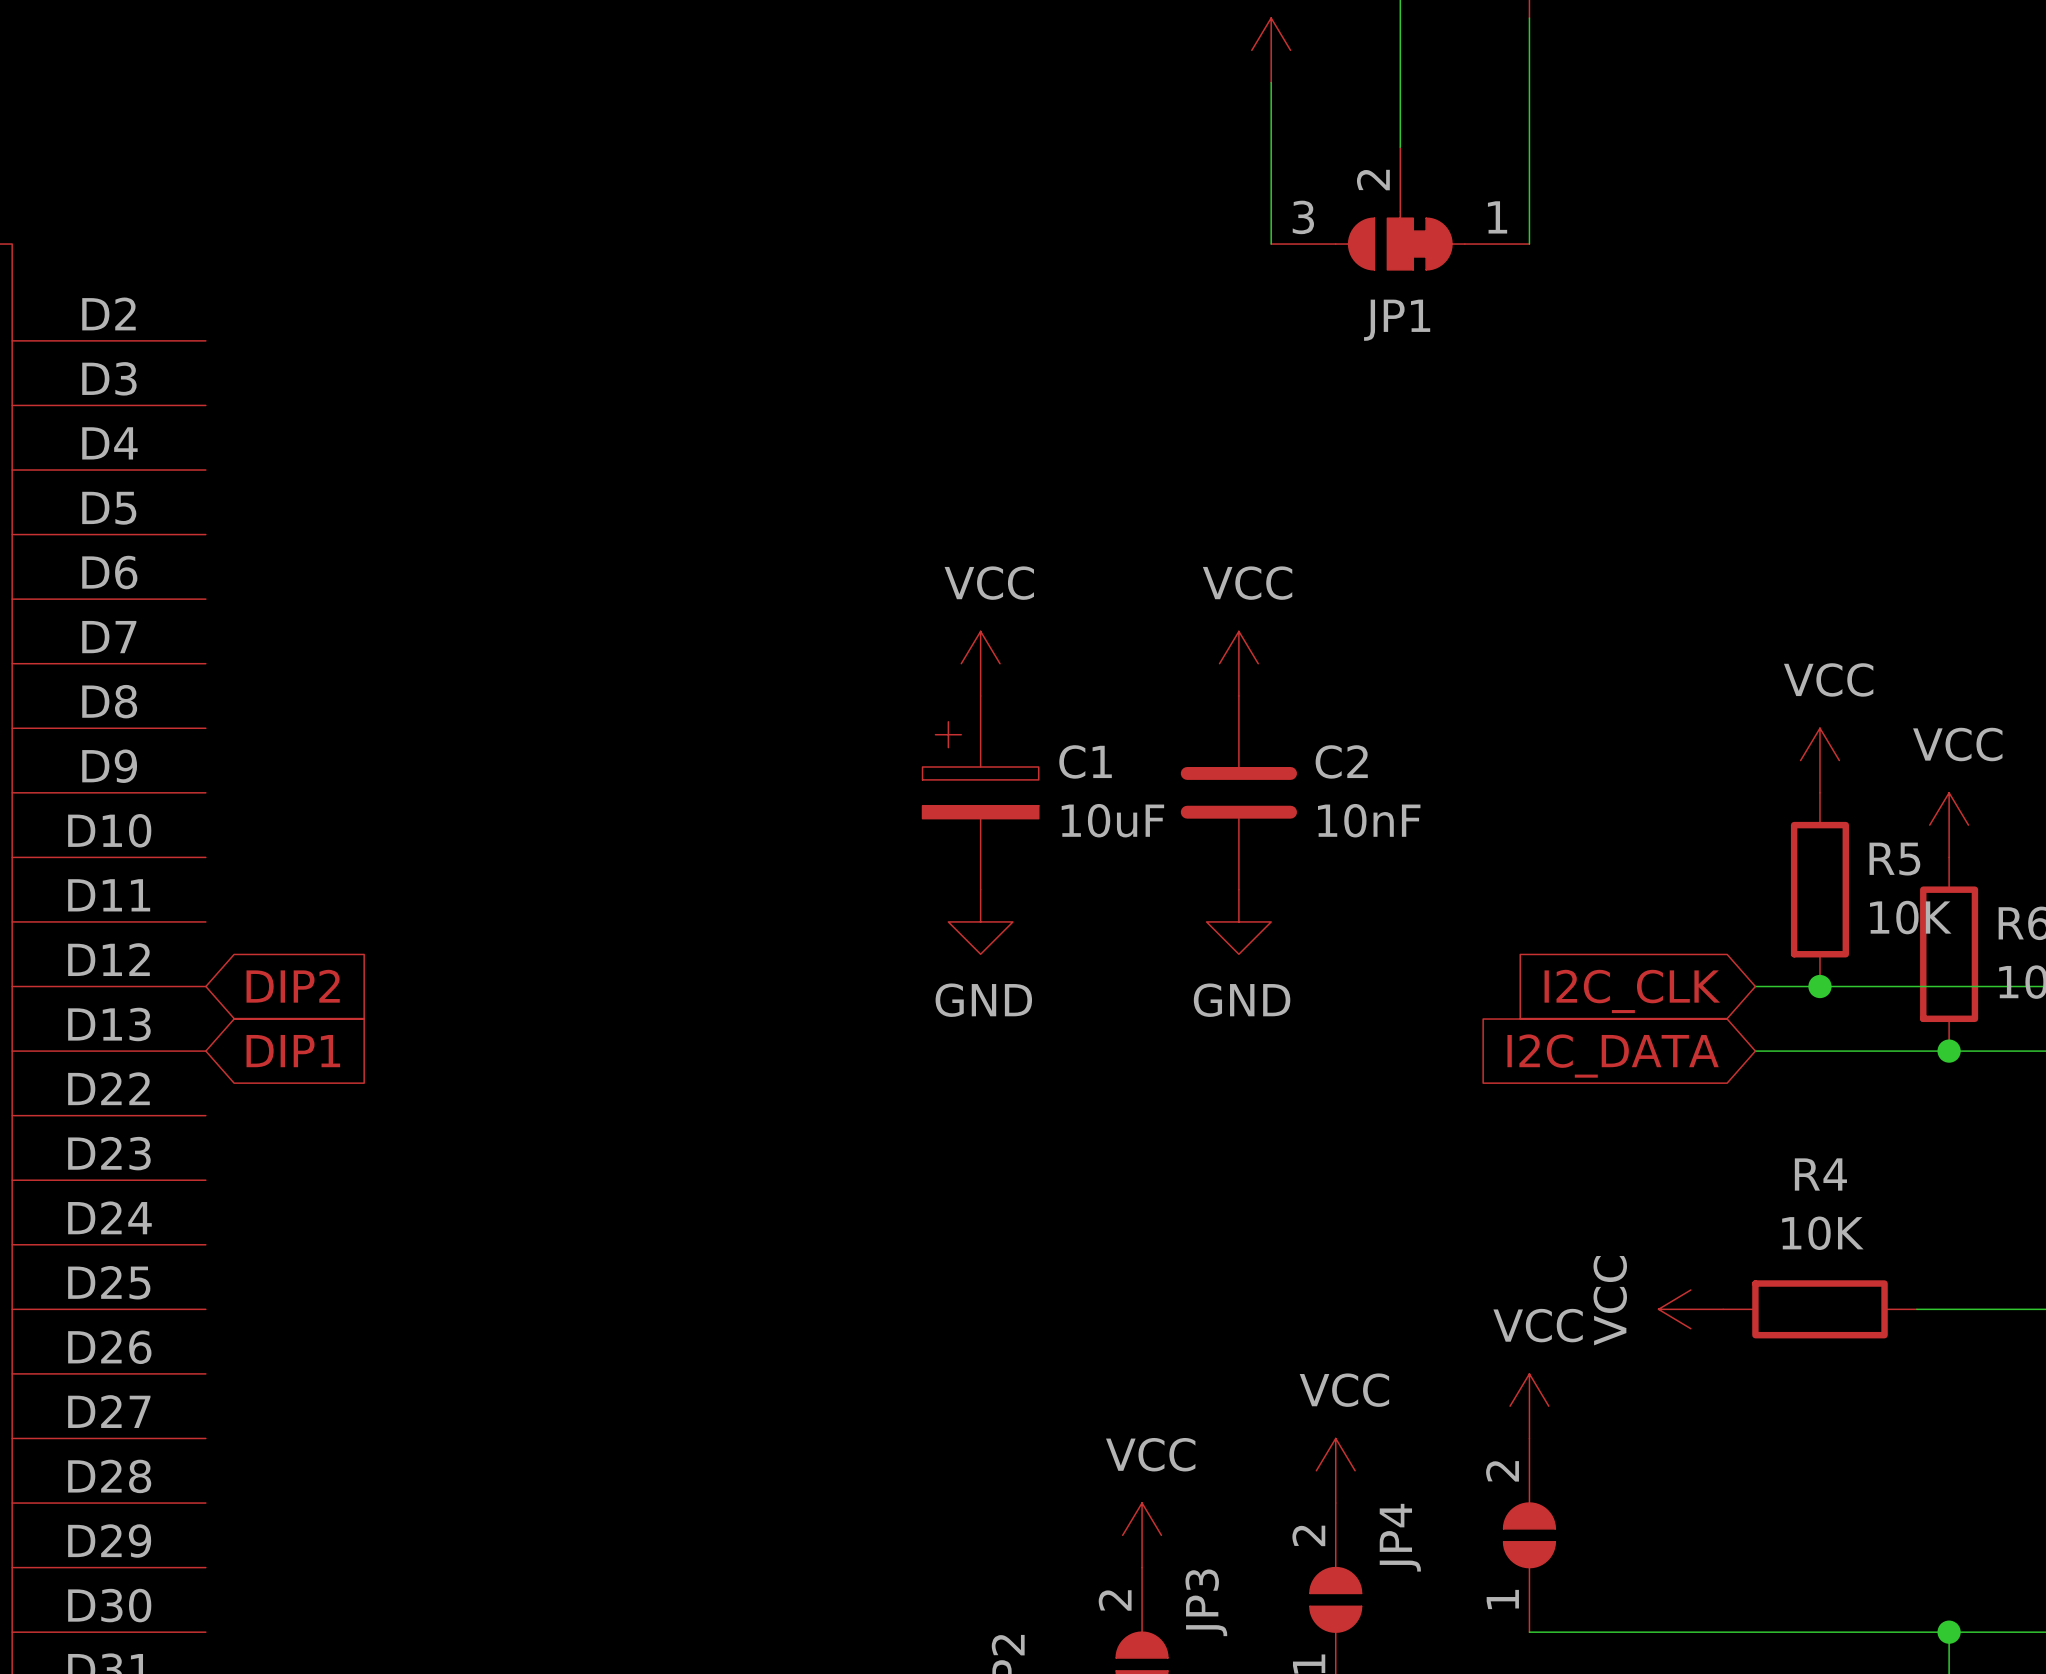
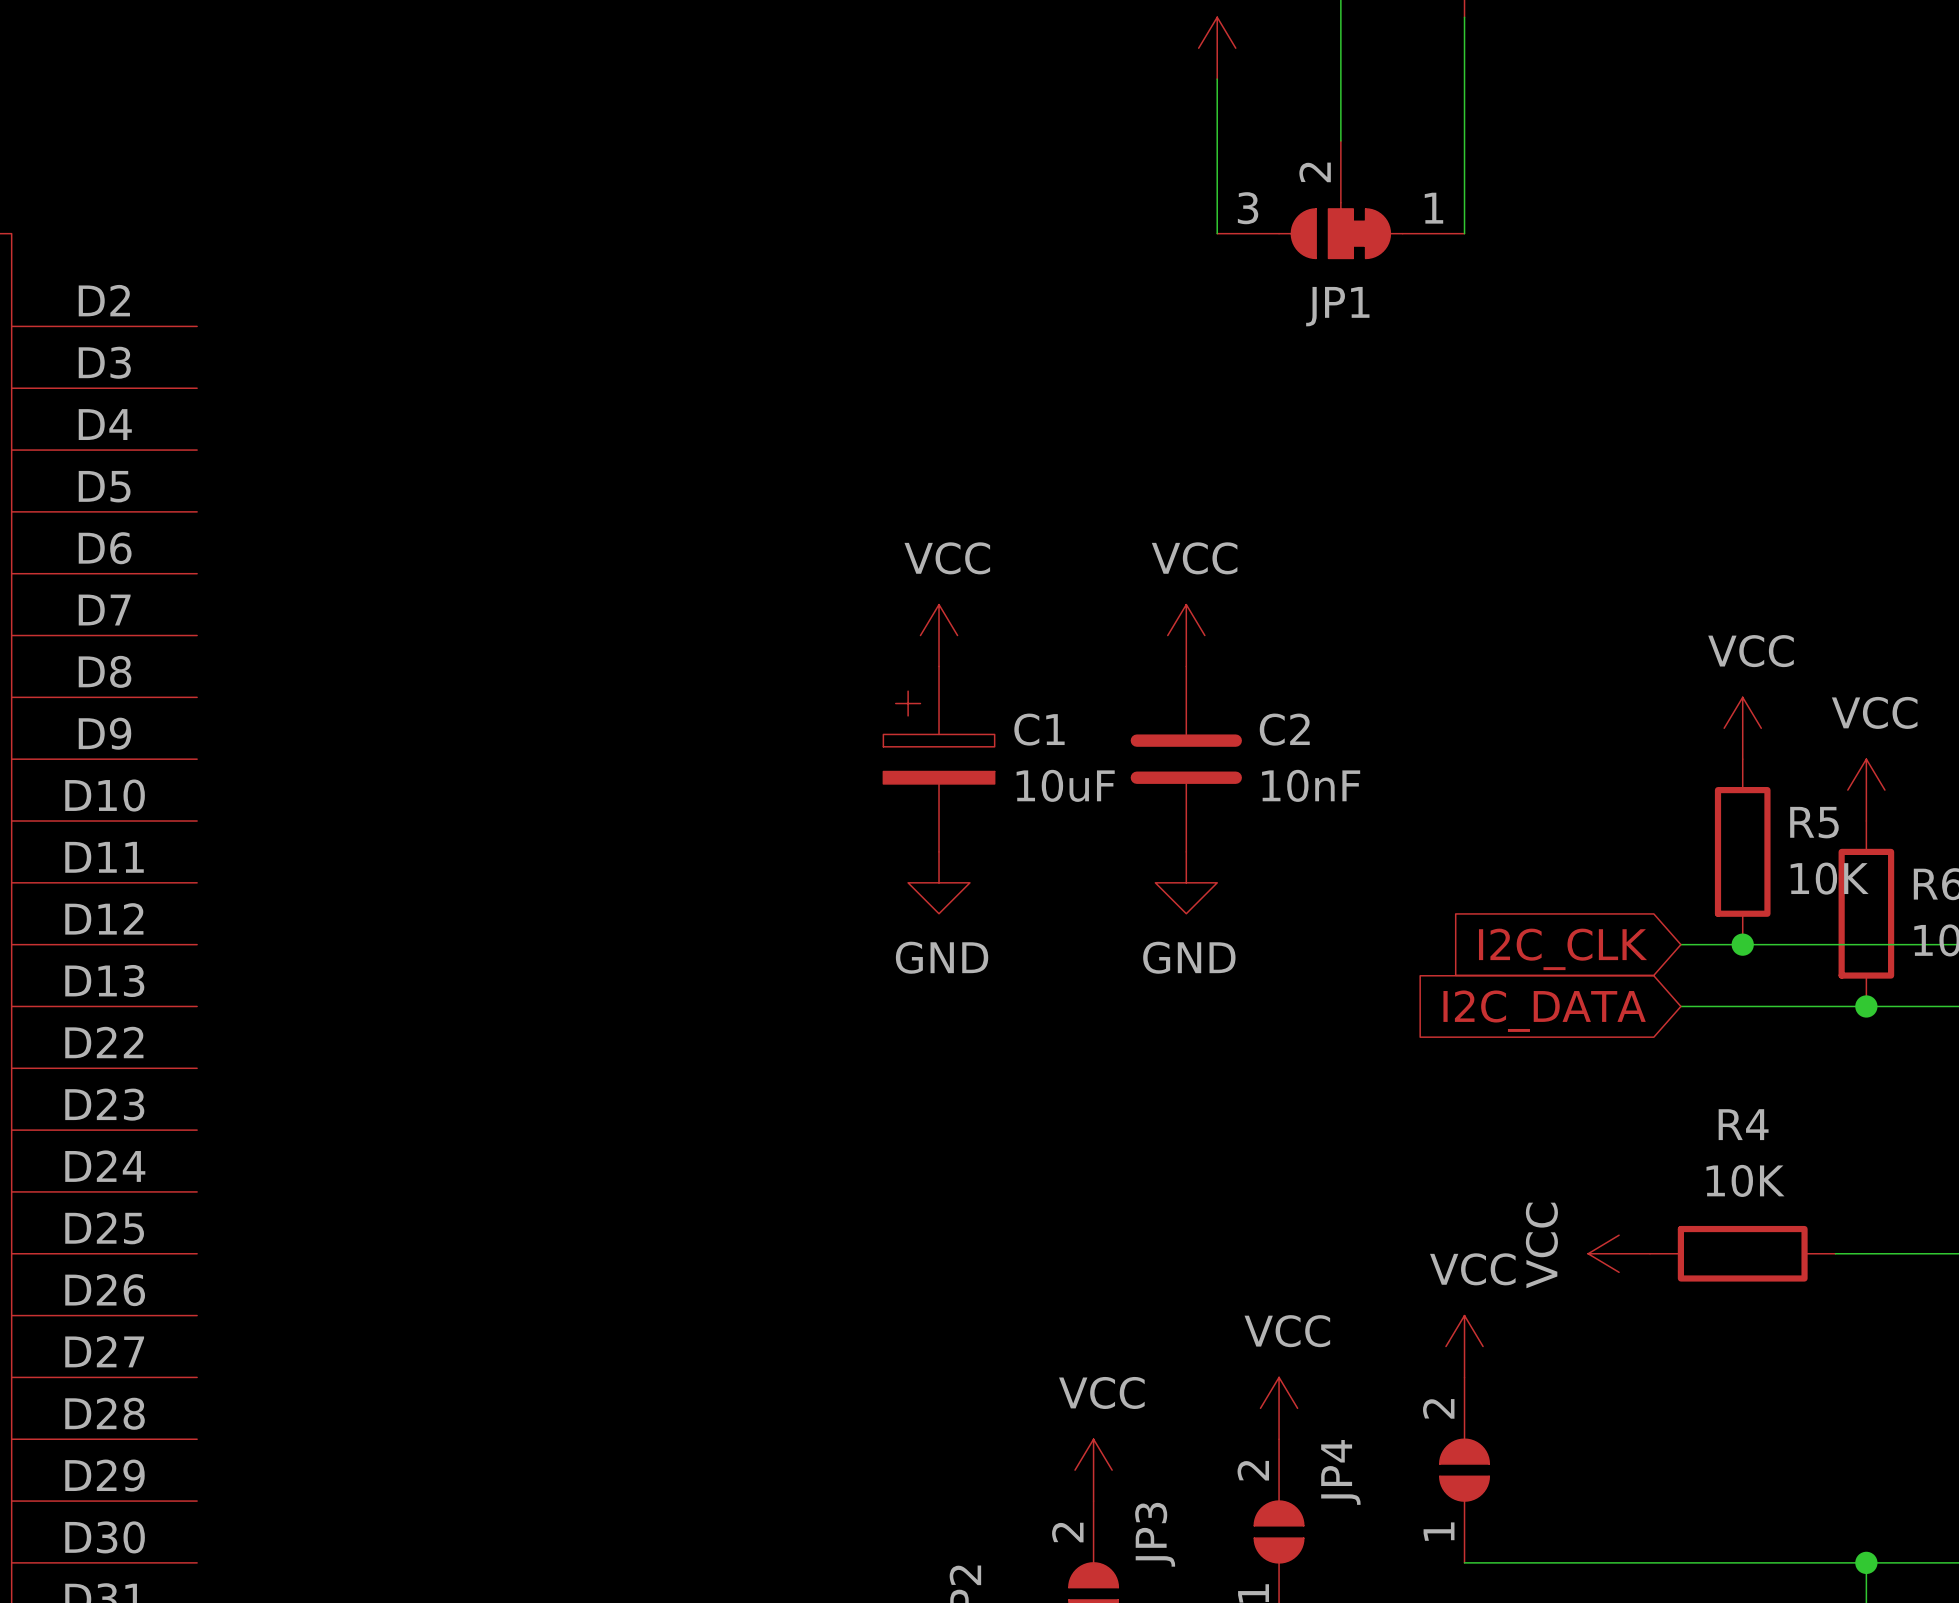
global label: DIP2 (293, 986) -> none
global label: DIP1 (293, 1051) -> none

